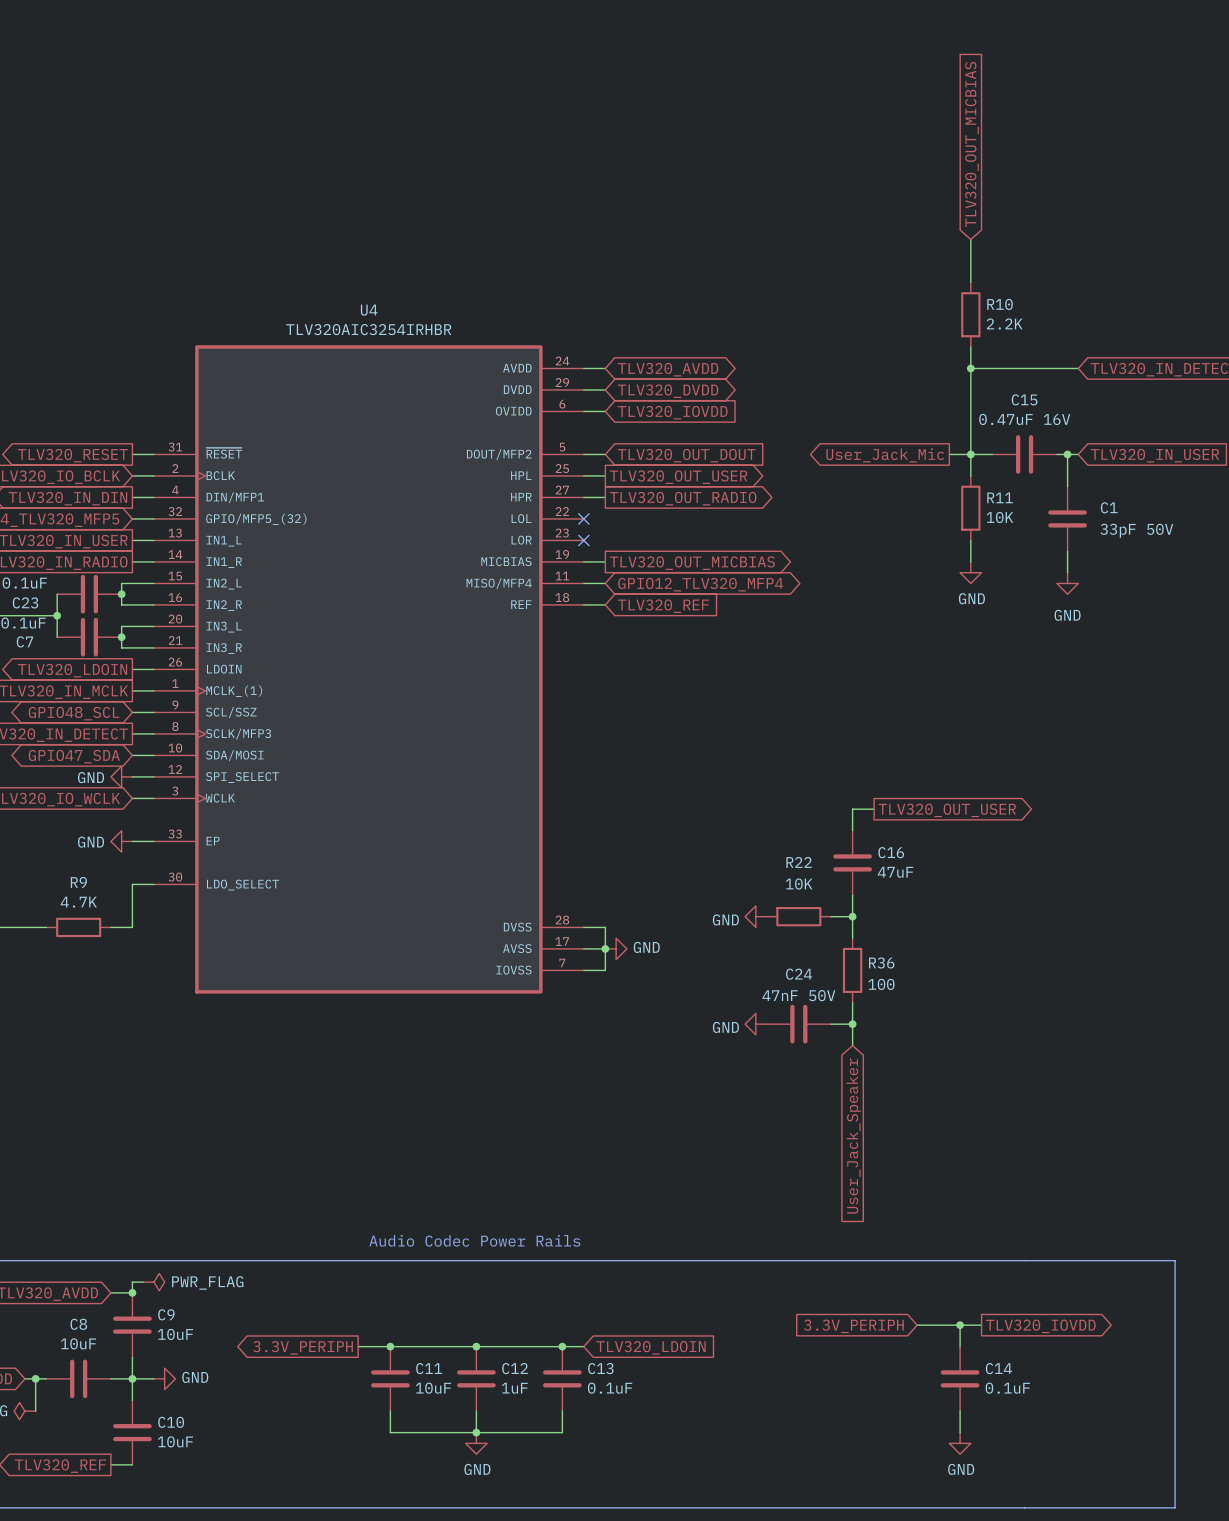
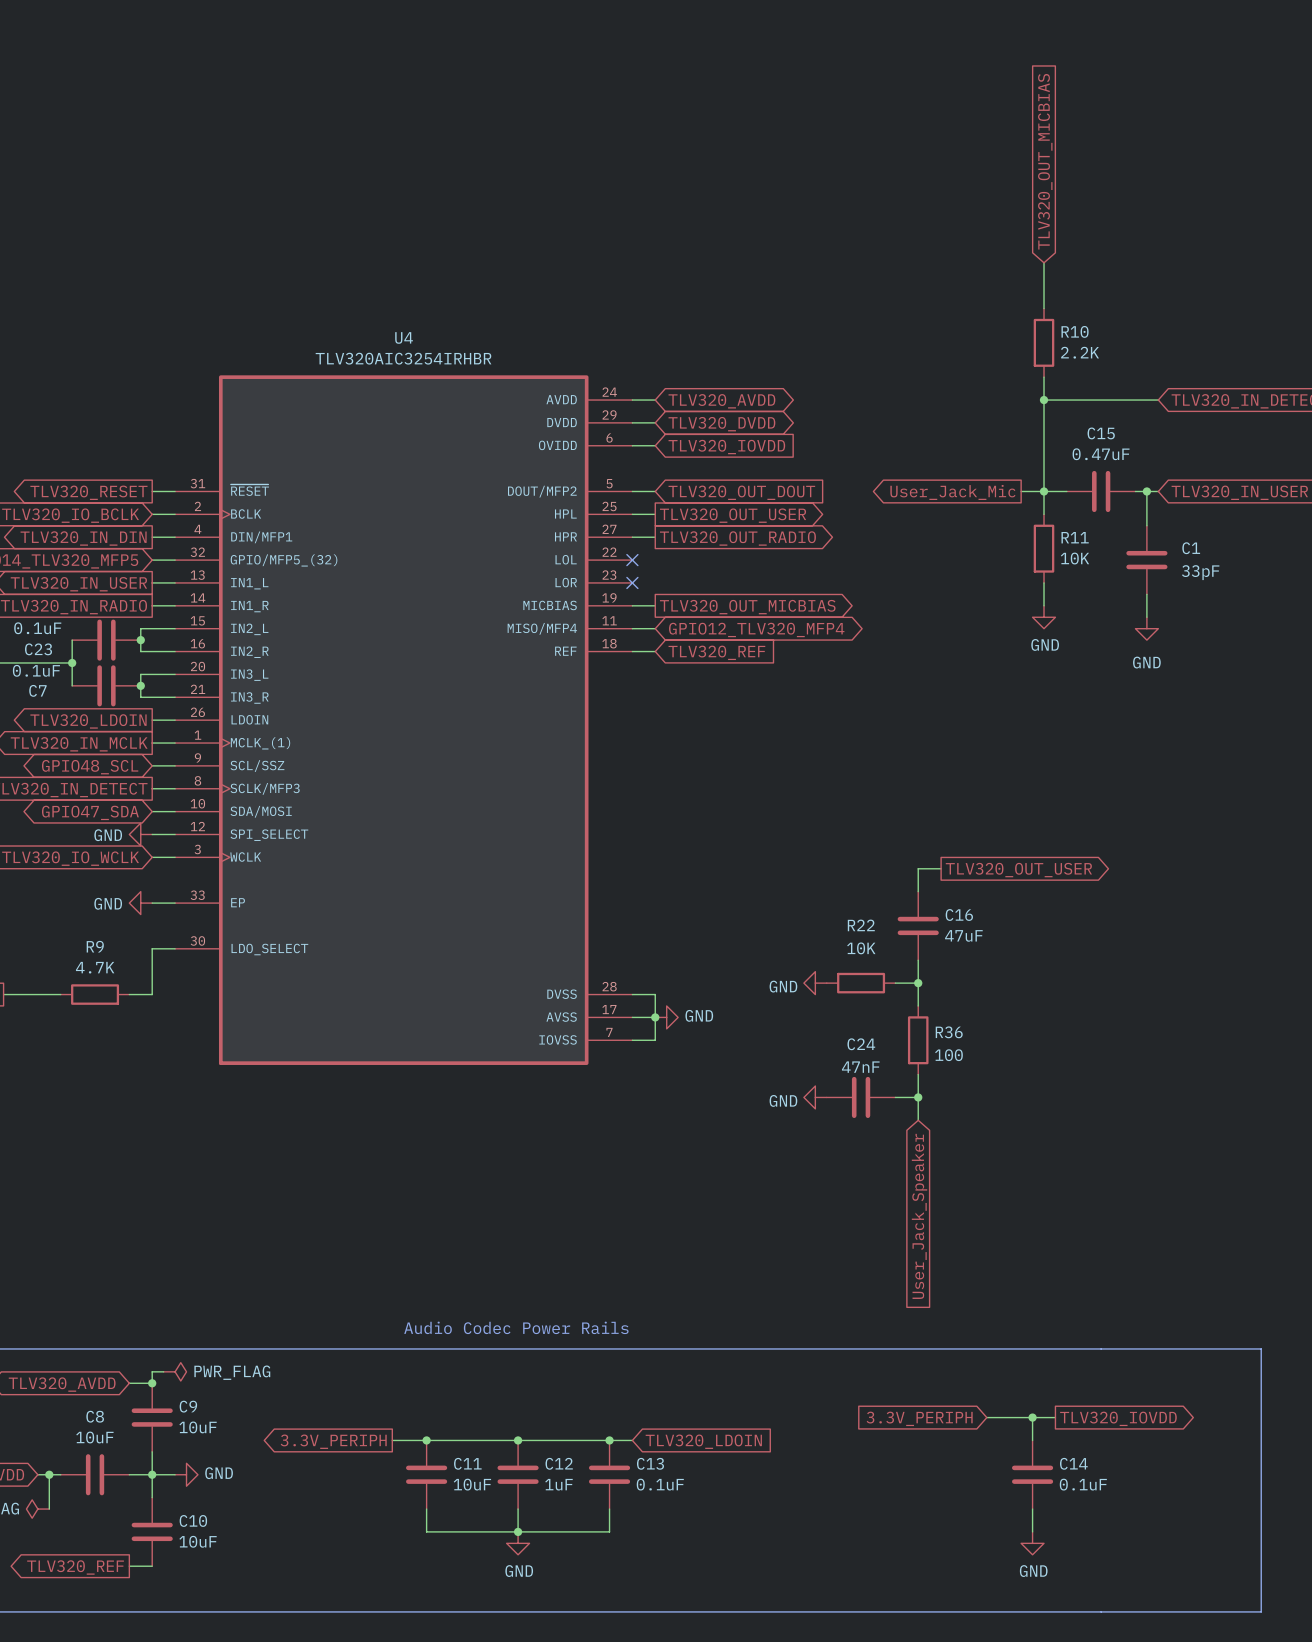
C15 value: 0.47uF 16V (1024, 419) -> 0.47uF (1101, 454)
C1 value: 33pF 50V (1136, 530) -> 33pF (1200, 572)
C24 value: 47nF 50V (798, 995) -> 47nF (860, 1067)

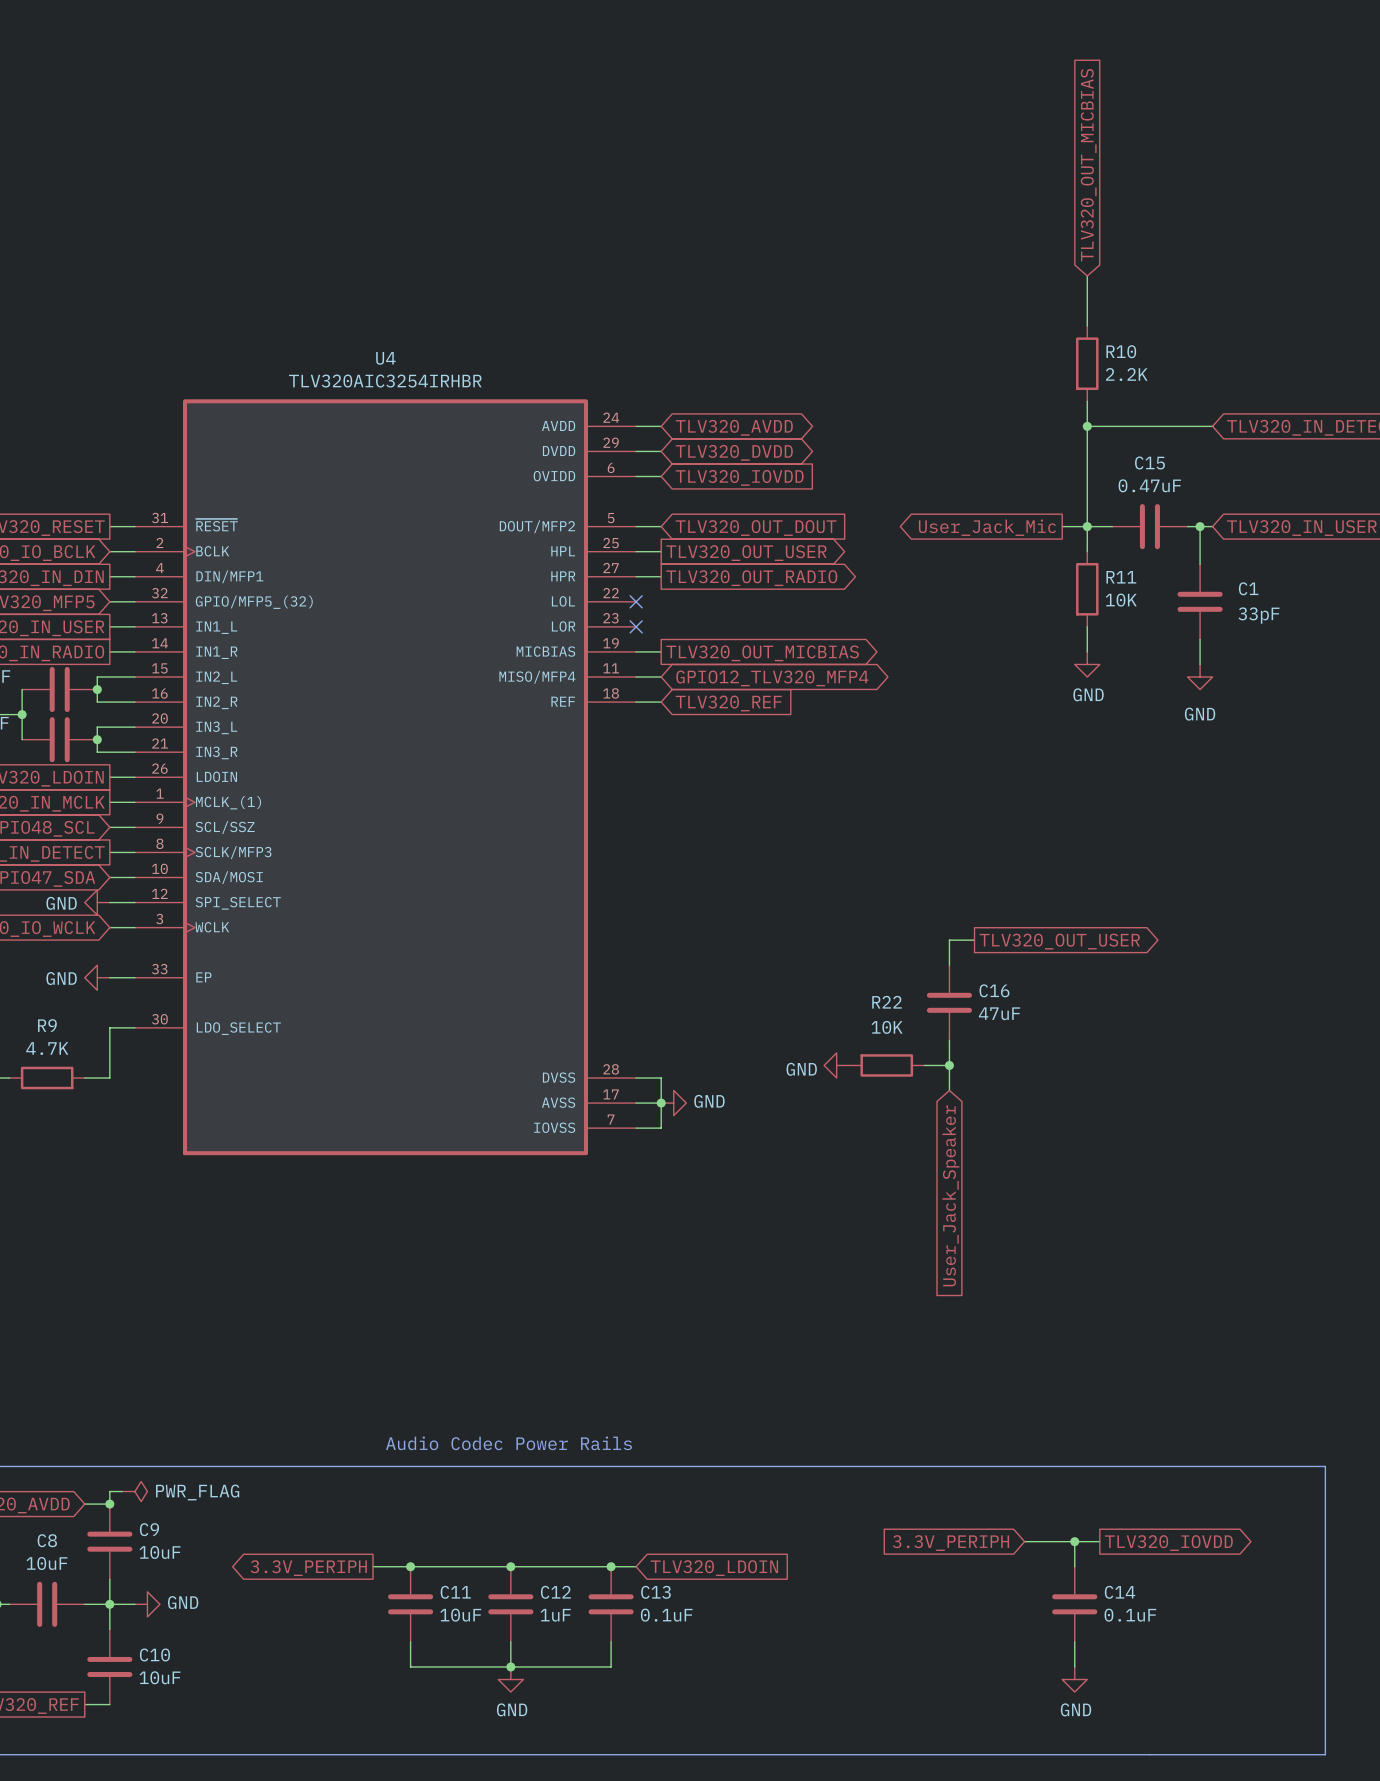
R36: 100 (918, 1040) -> none
wire: (918, 1074) (918, 1120) -> none
power symbol: GND (815, 1097) -> none
C24: 47nF (861, 1097) -> none
wire: (895, 1097) (918, 1097) -> none
junction: (918, 1097) -> none
global label position: User_Jack_Speaker (919, 1216) -> User_Jack_Speaker (950, 1195)

